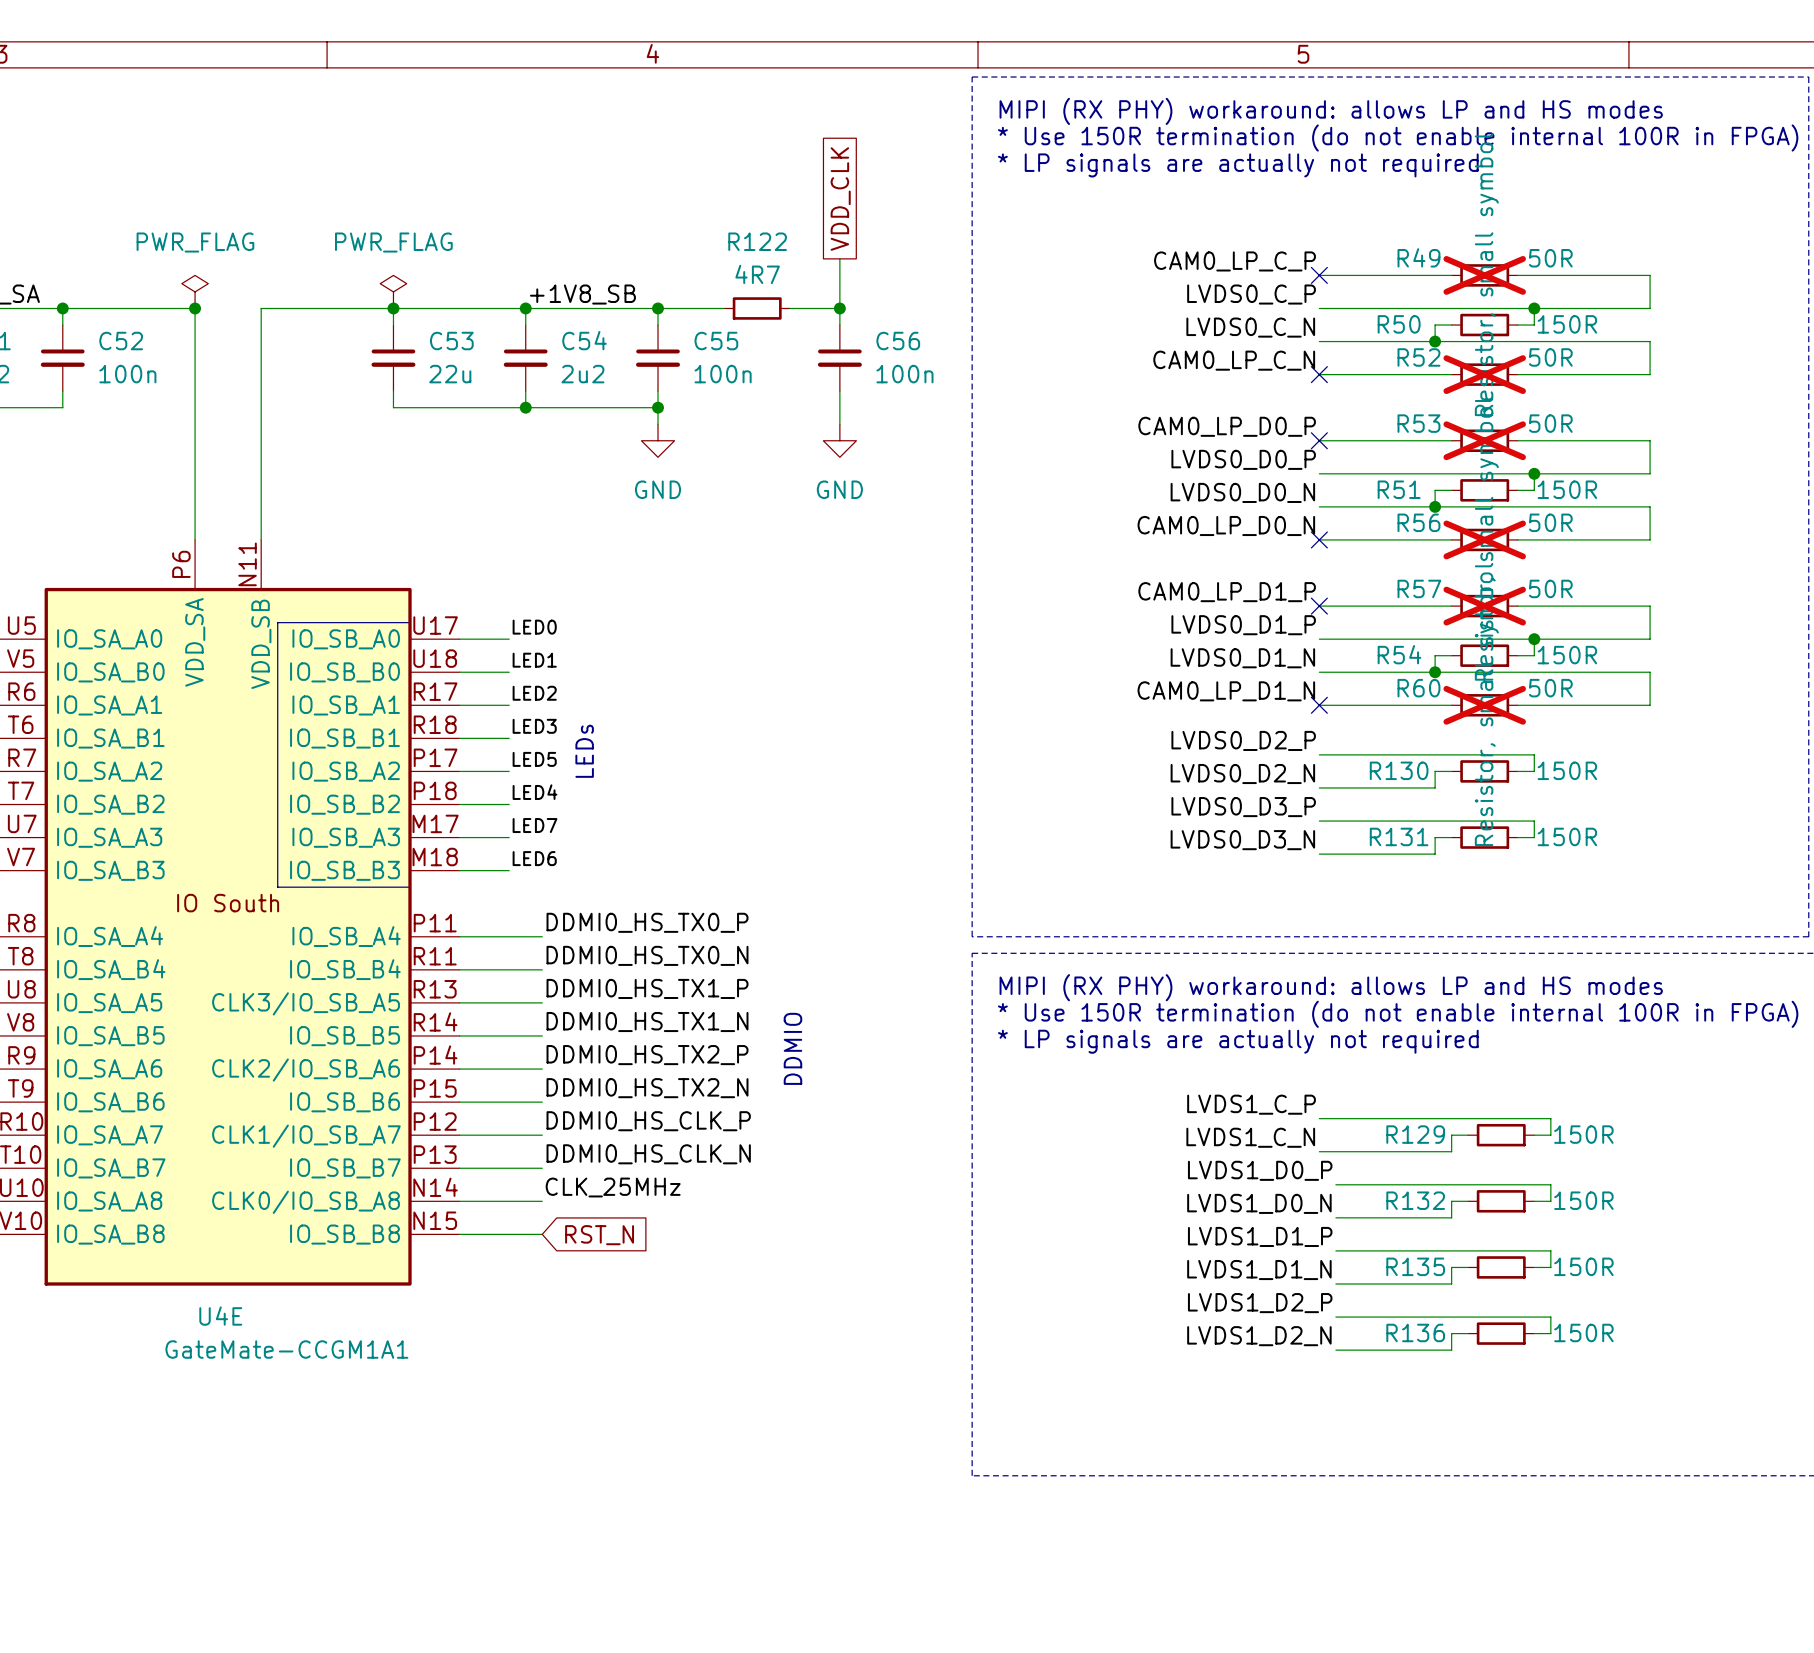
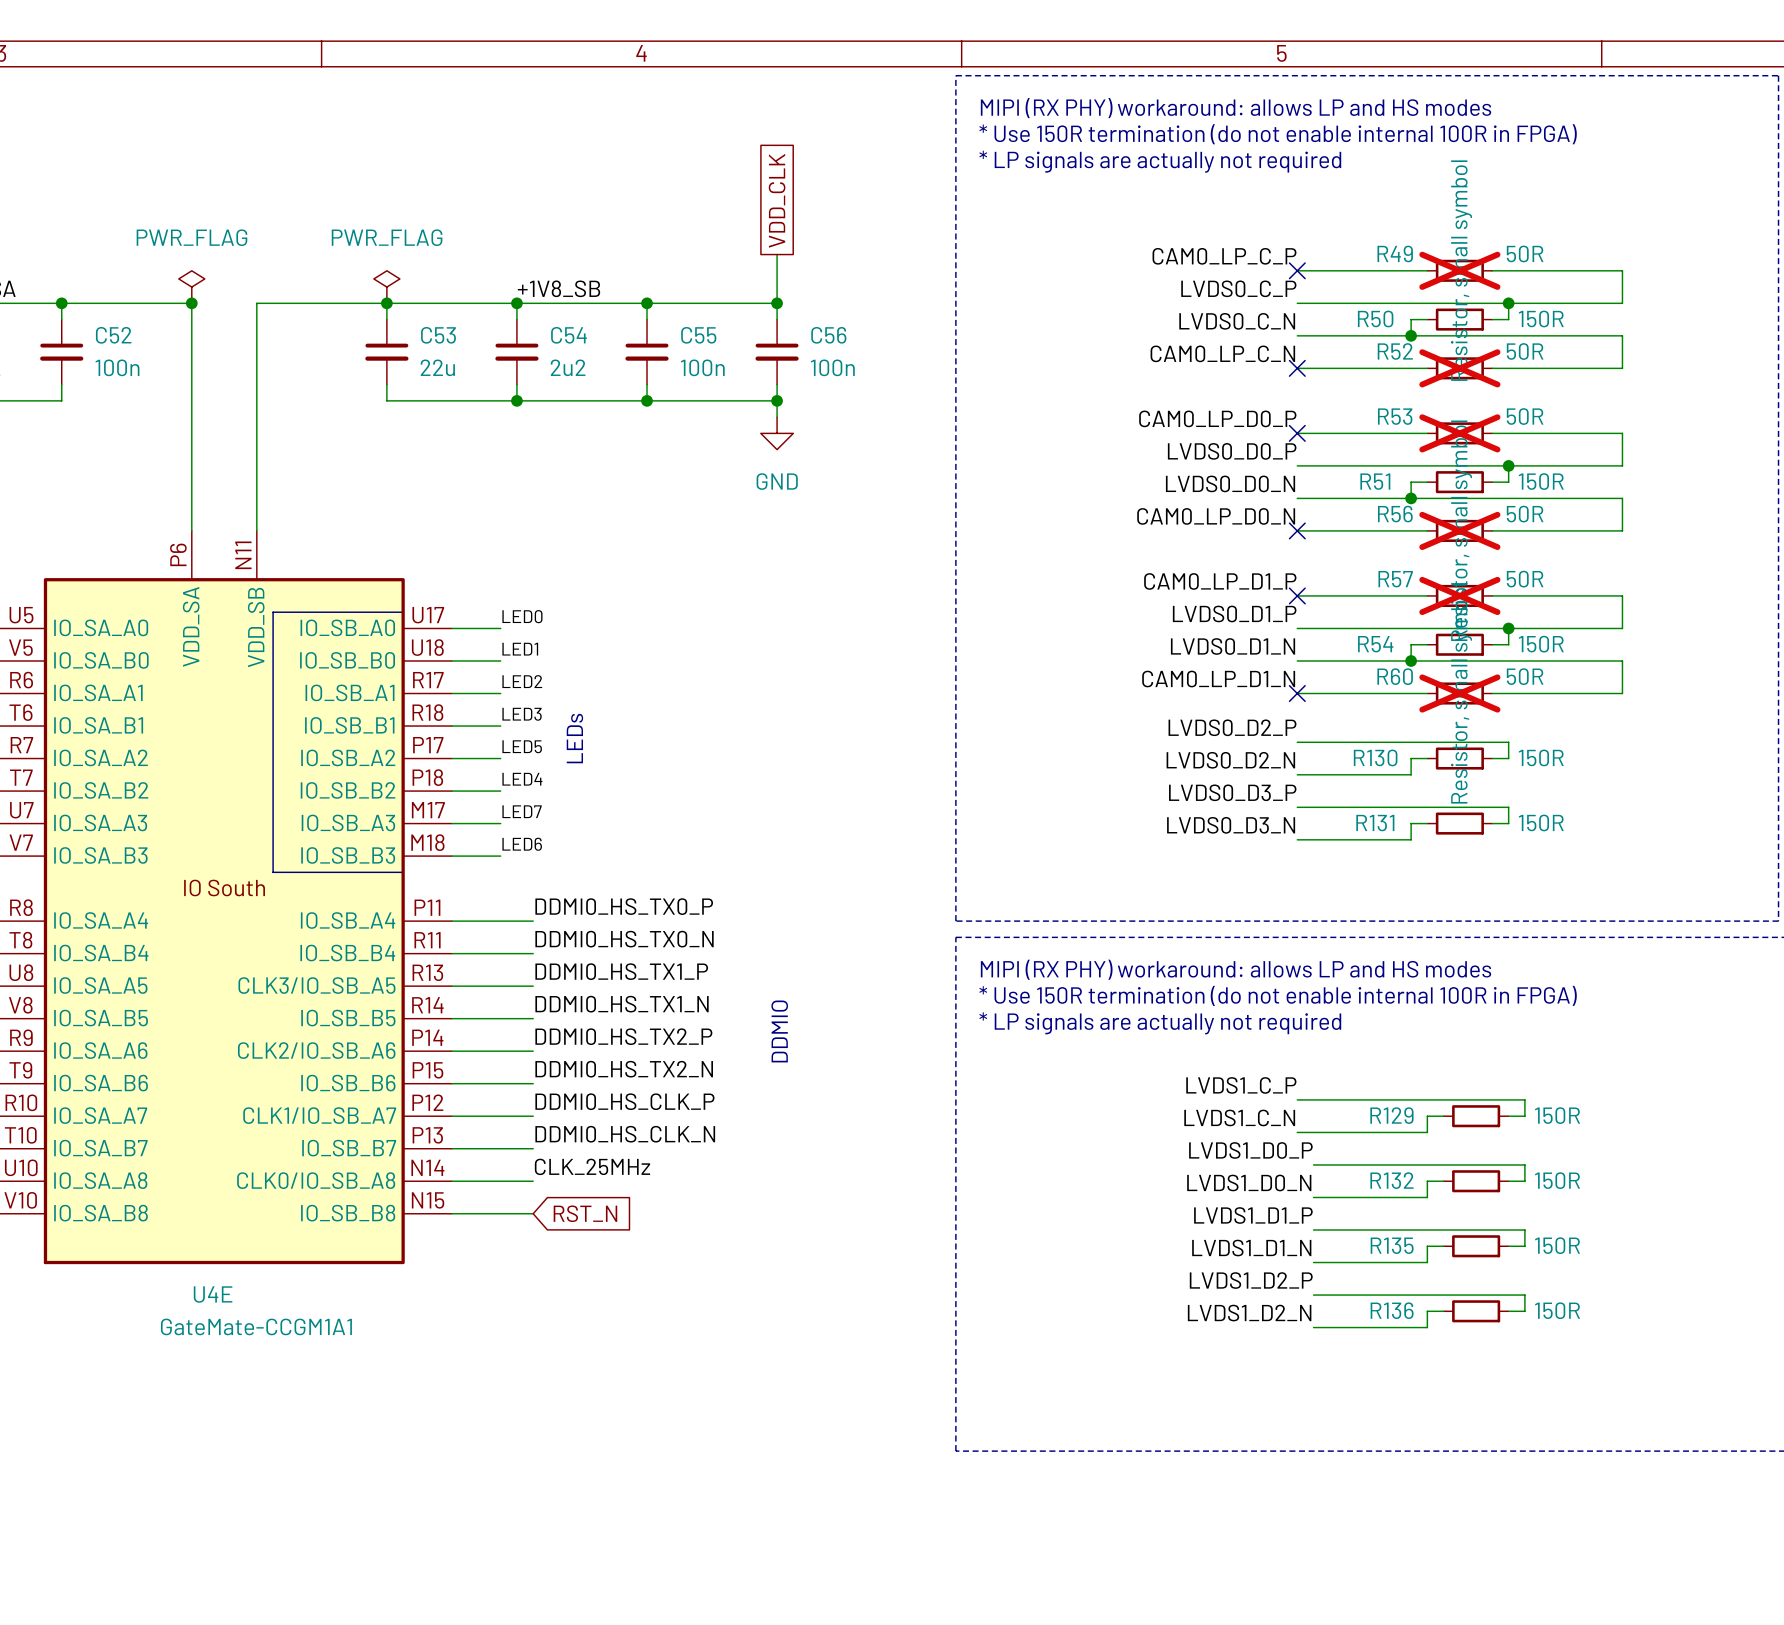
global label position: VDD_CLK (840, 199) -> VDD_CLK (777, 200)
wire: (839, 258) (839, 325) -> (777, 254) (777, 319)
R122: 4R7 (757, 308) -> none
wire: (790, 308) (839, 308) -> (777, 303) (712, 303)
junction position: (839, 308) -> (777, 303)
C56 position: (839, 358) -> (777, 352)
wire: (839, 391) (839, 424) -> (777, 384) (777, 417)
wire: (658, 407) (658, 424) -> (647, 400) (777, 400)
junction: none -> (777, 400)
power symbol: GND (658, 440) -> none
power symbol position: GND (839, 440) -> GND (777, 433)

